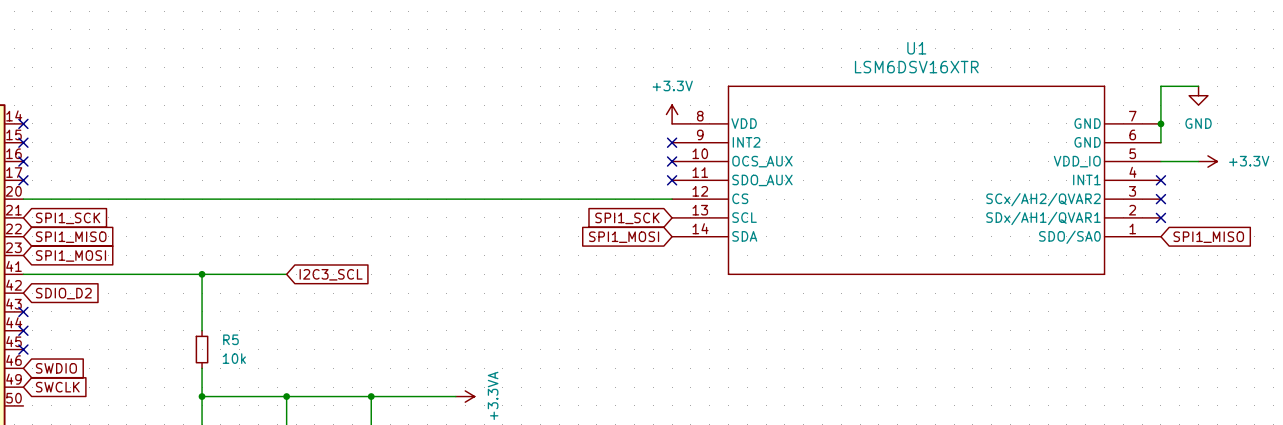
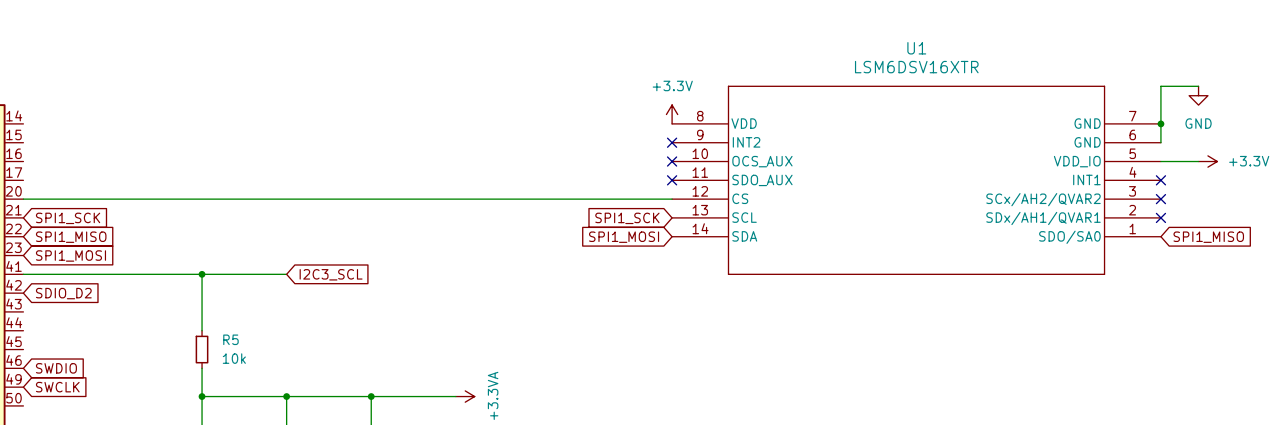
no-connect mark: (23, 123) -> none
no-connect mark: (23, 142) -> none
no-connect mark: (23, 161) -> none
no-connect mark: (23, 180) -> none
no-connect mark: (23, 311) -> none
no-connect mark: (23, 330) -> none
no-connect mark: (23, 349) -> none

